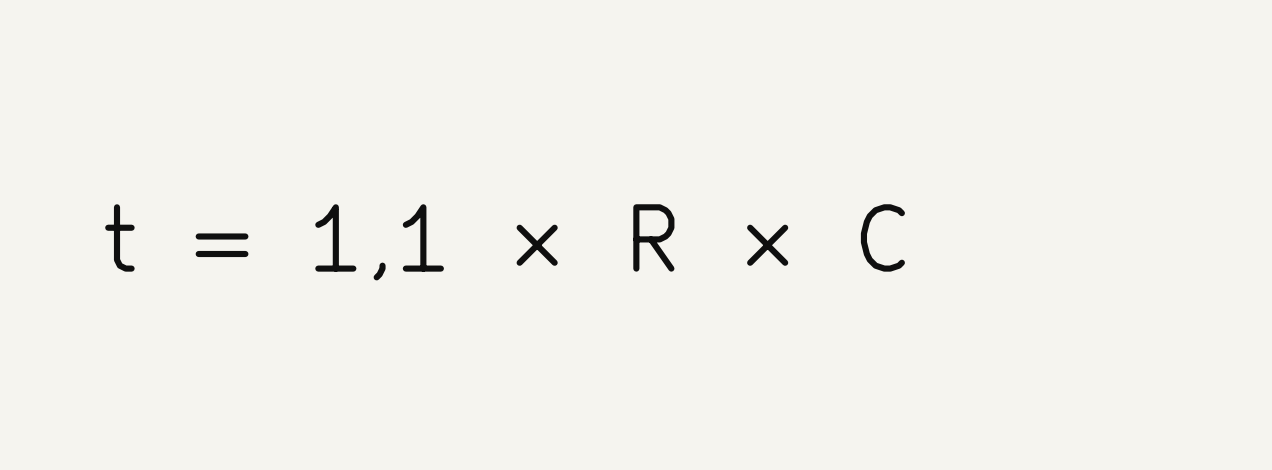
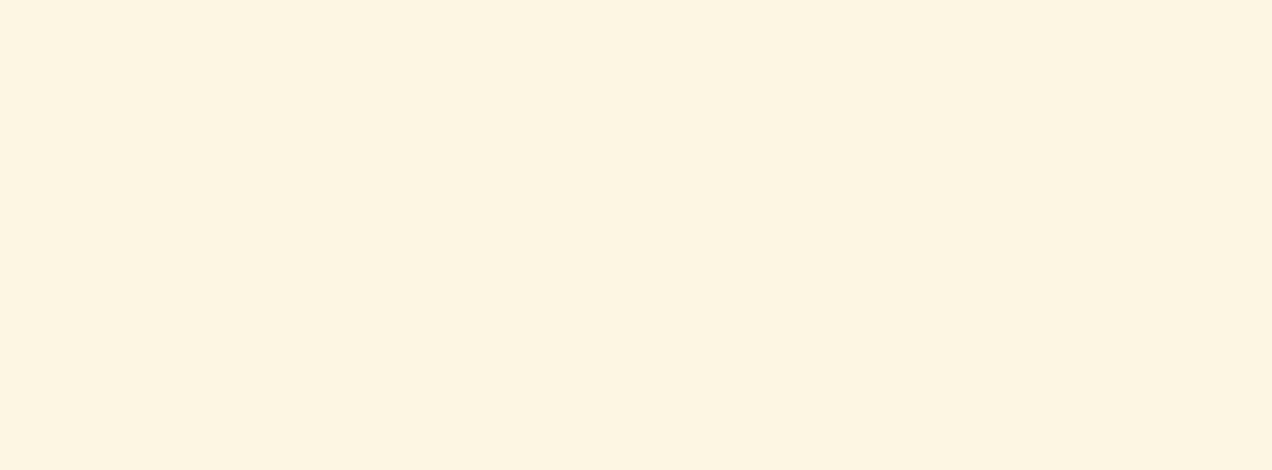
label: t = 1,1 × R × C (505, 242) -> none

